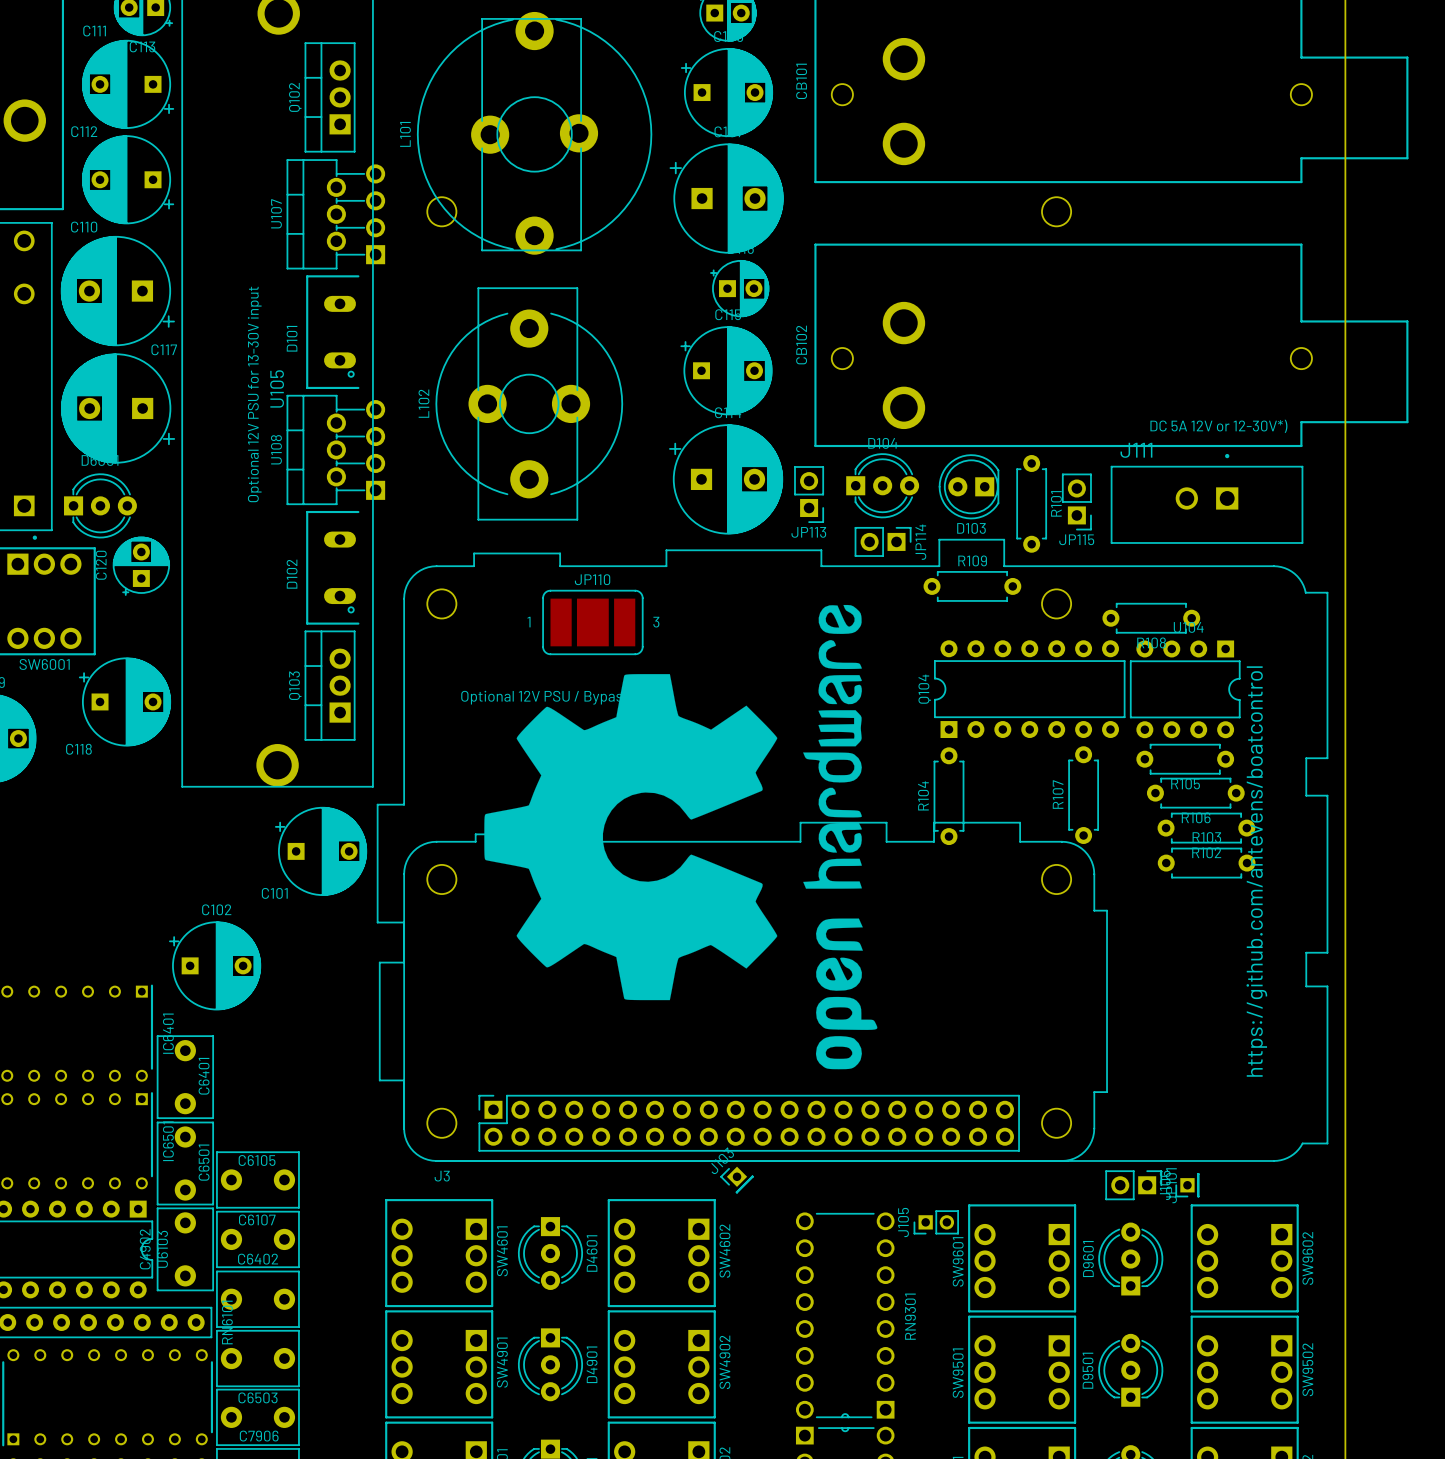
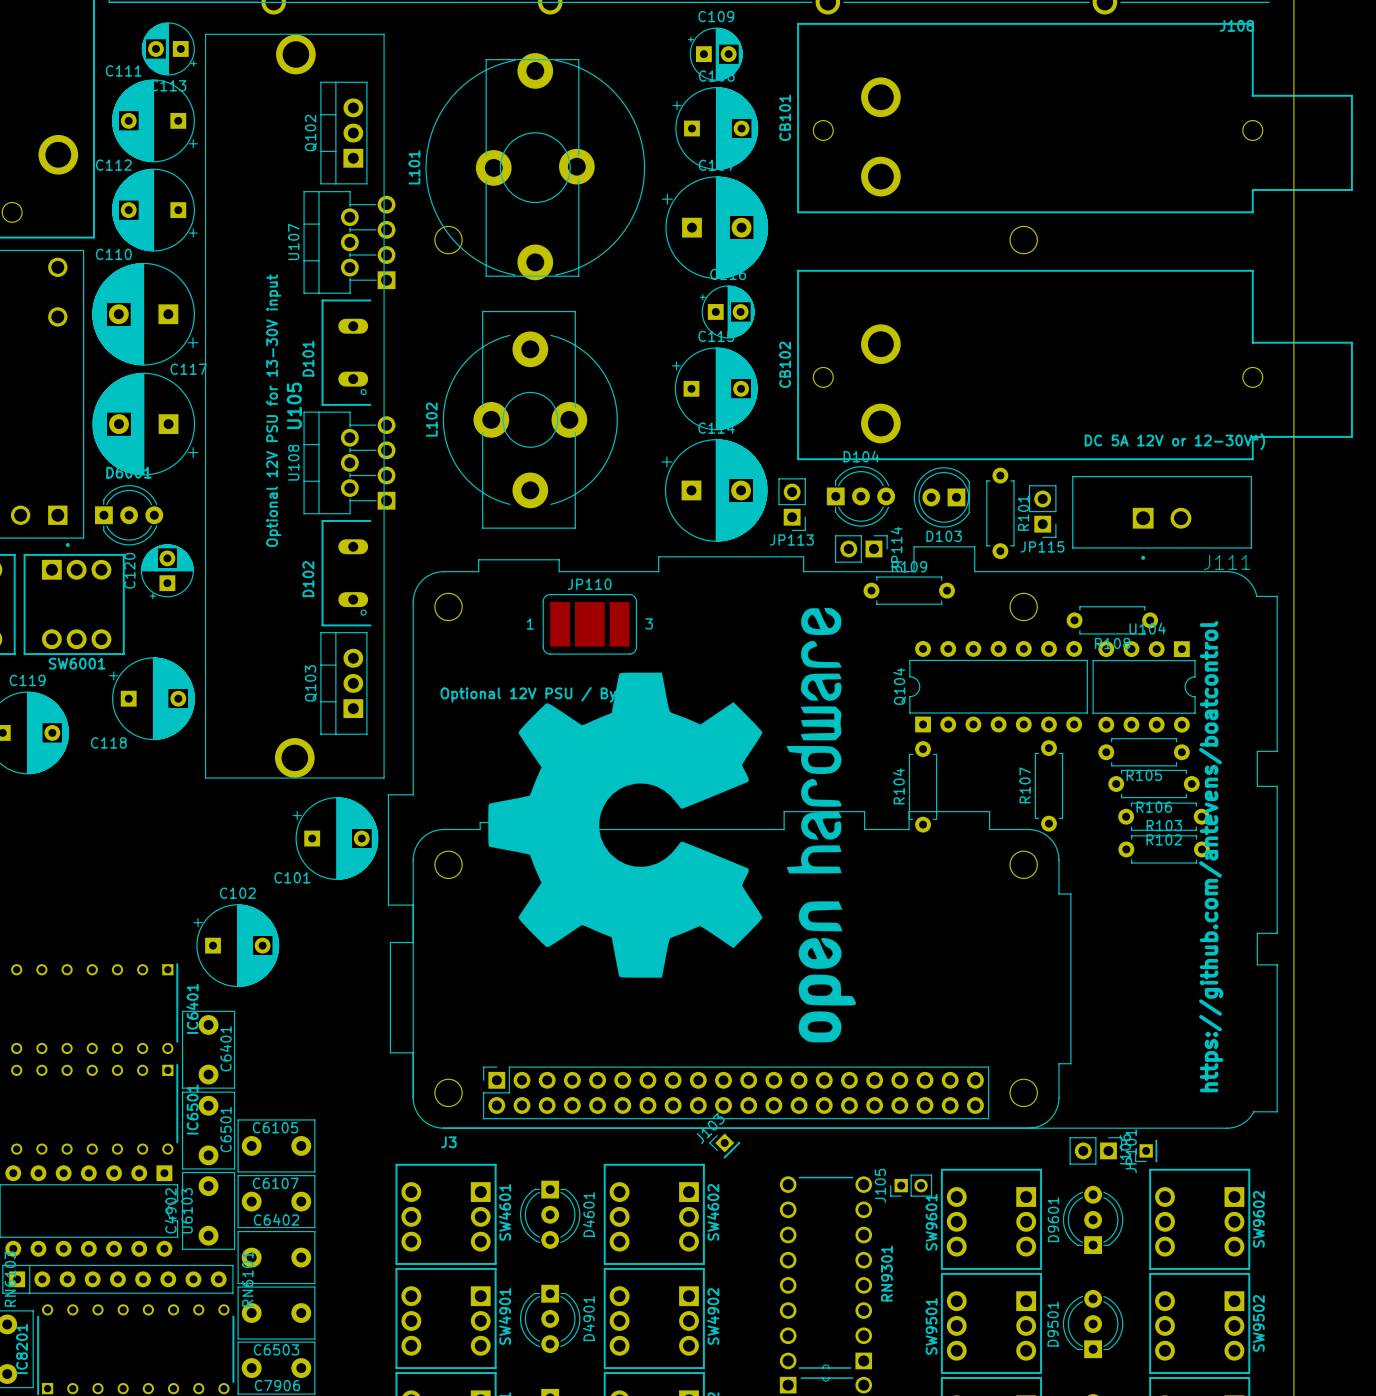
J111 rotation: 0° (1207, 498) -> 180° (1162, 517)
R109 position: (972, 586) -> (909, 590)

